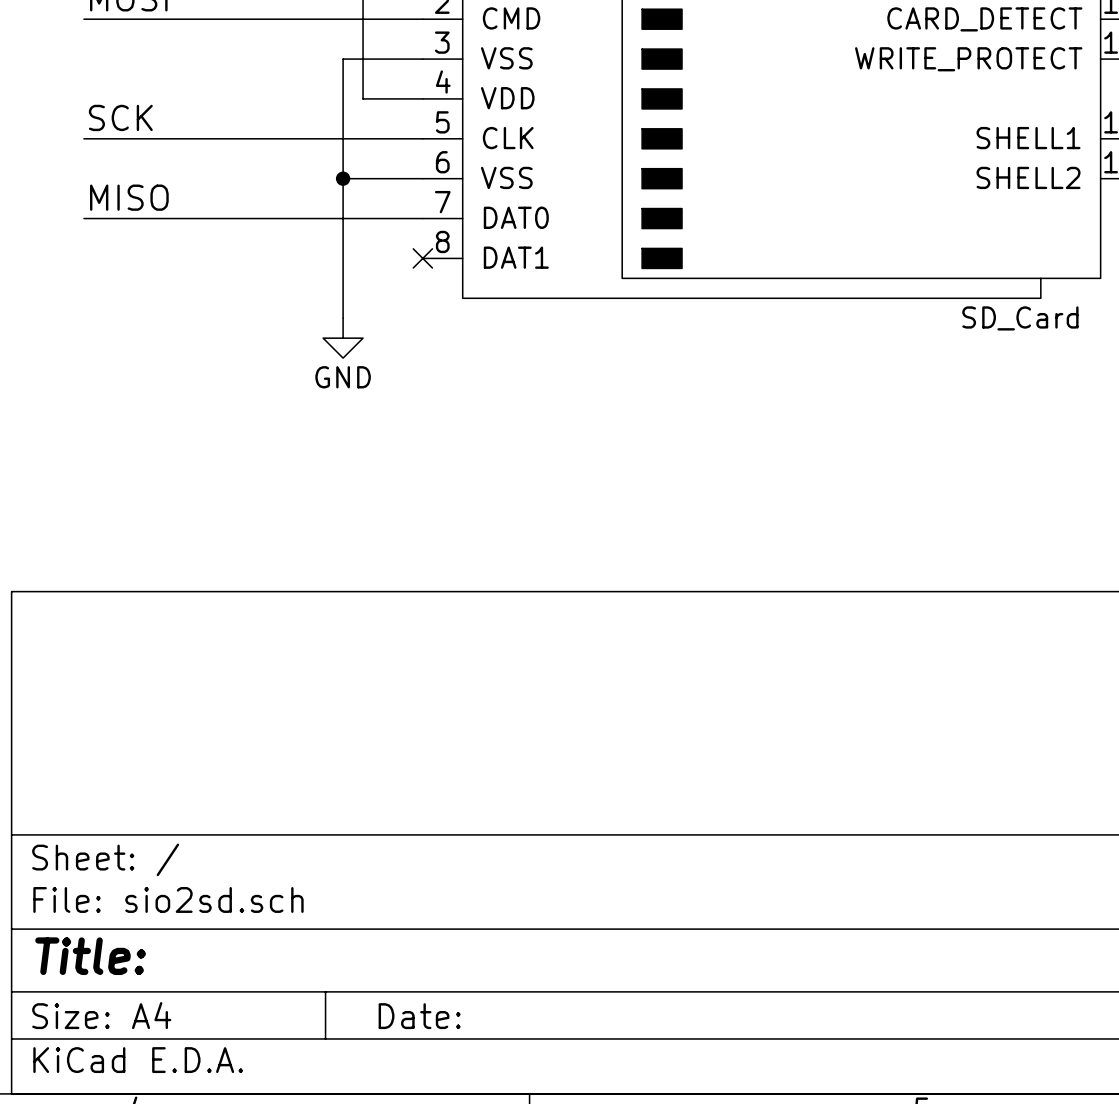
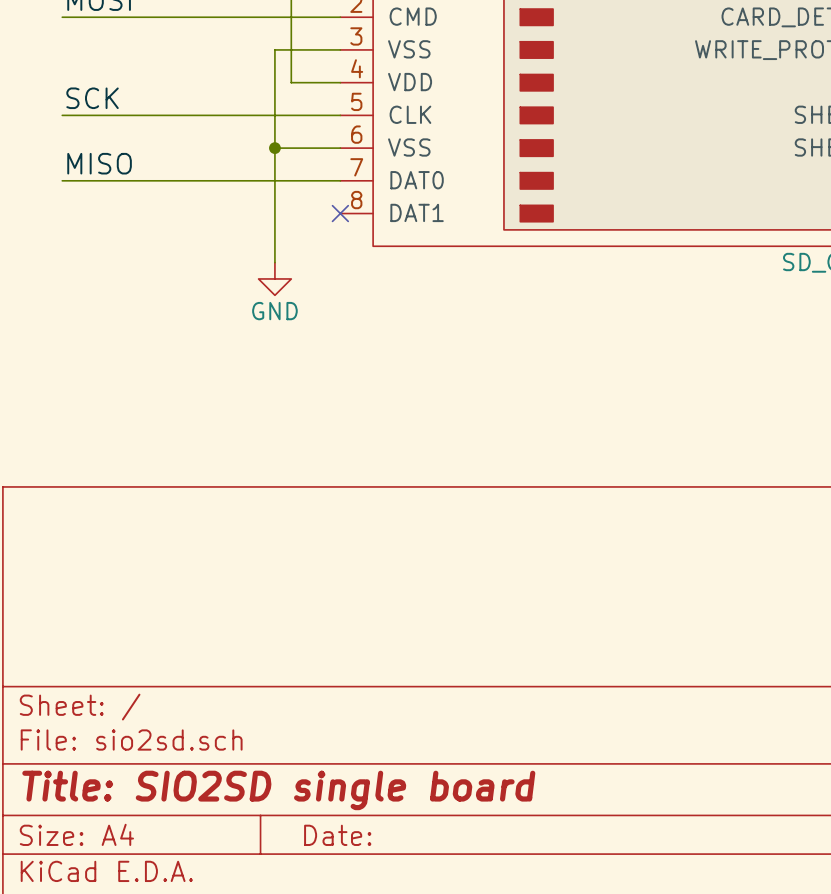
title block: Title: (90, 956) -> Title: SIO2SD single board (278, 790)

